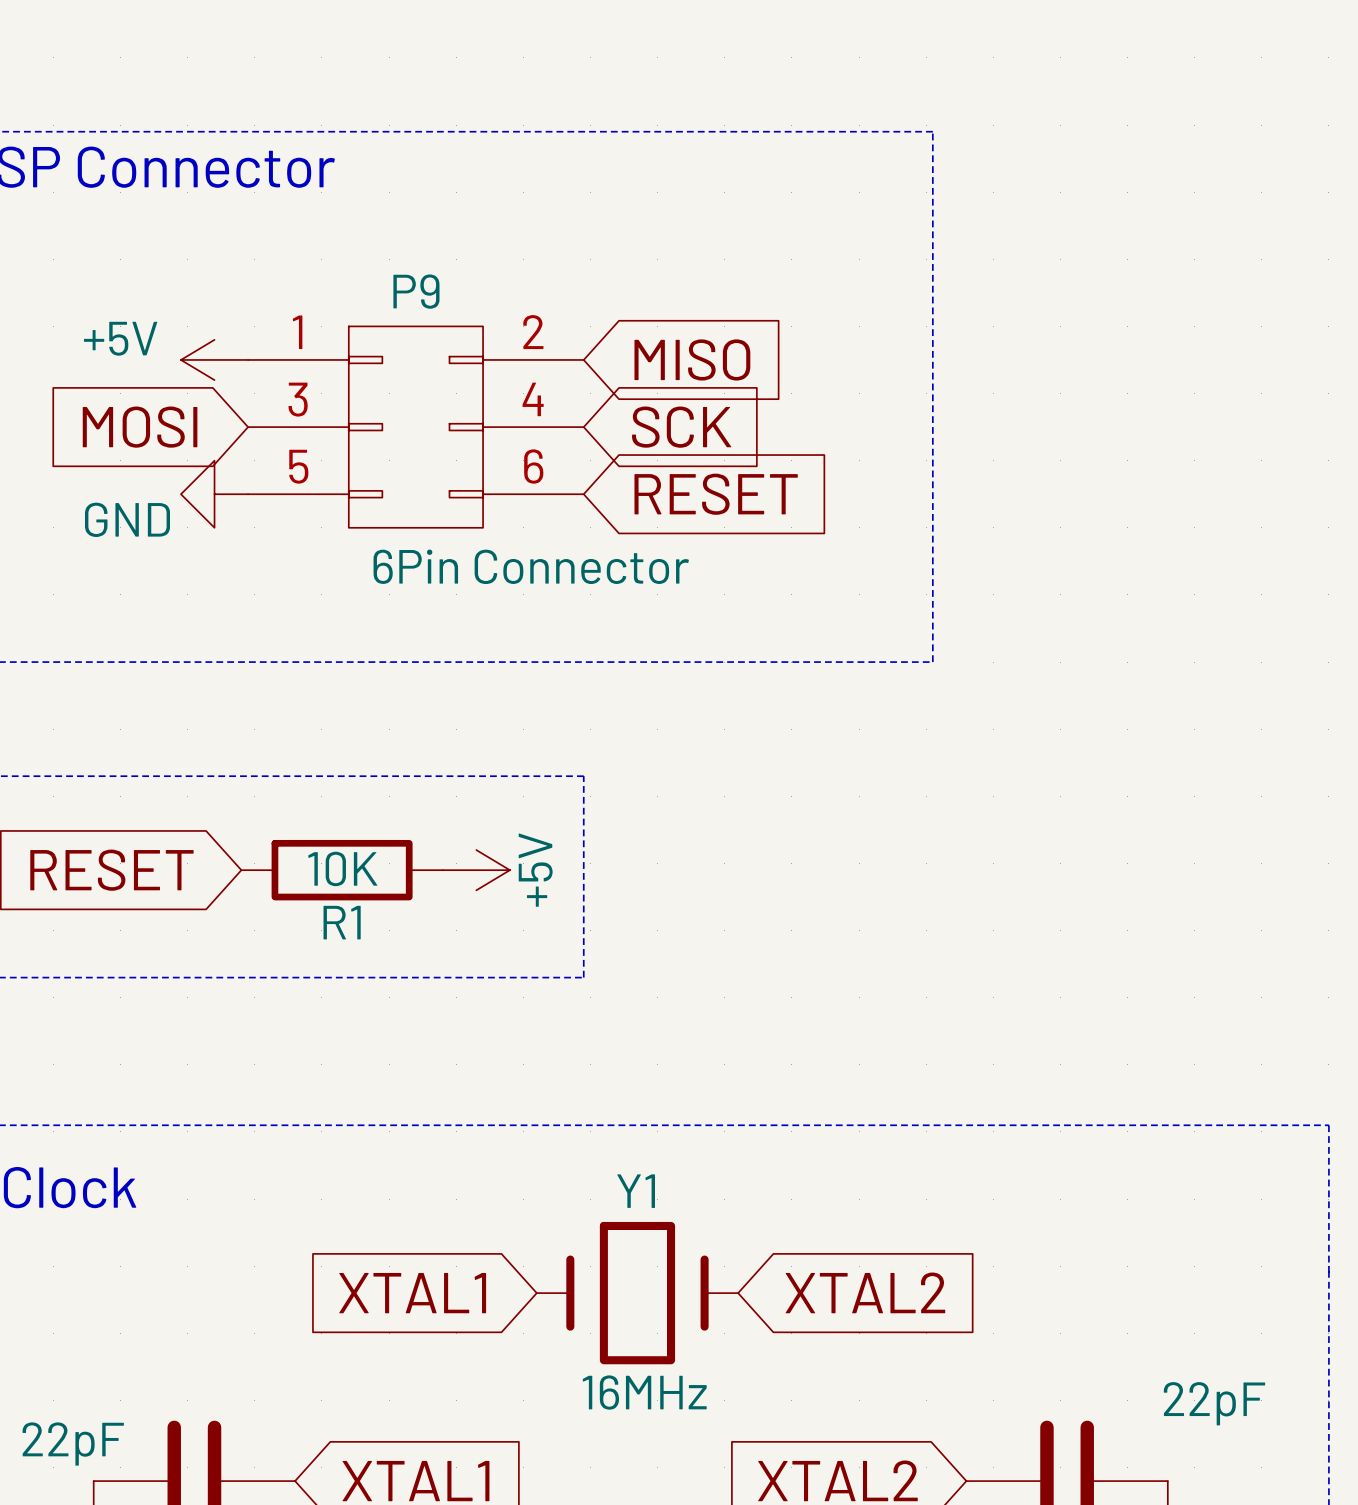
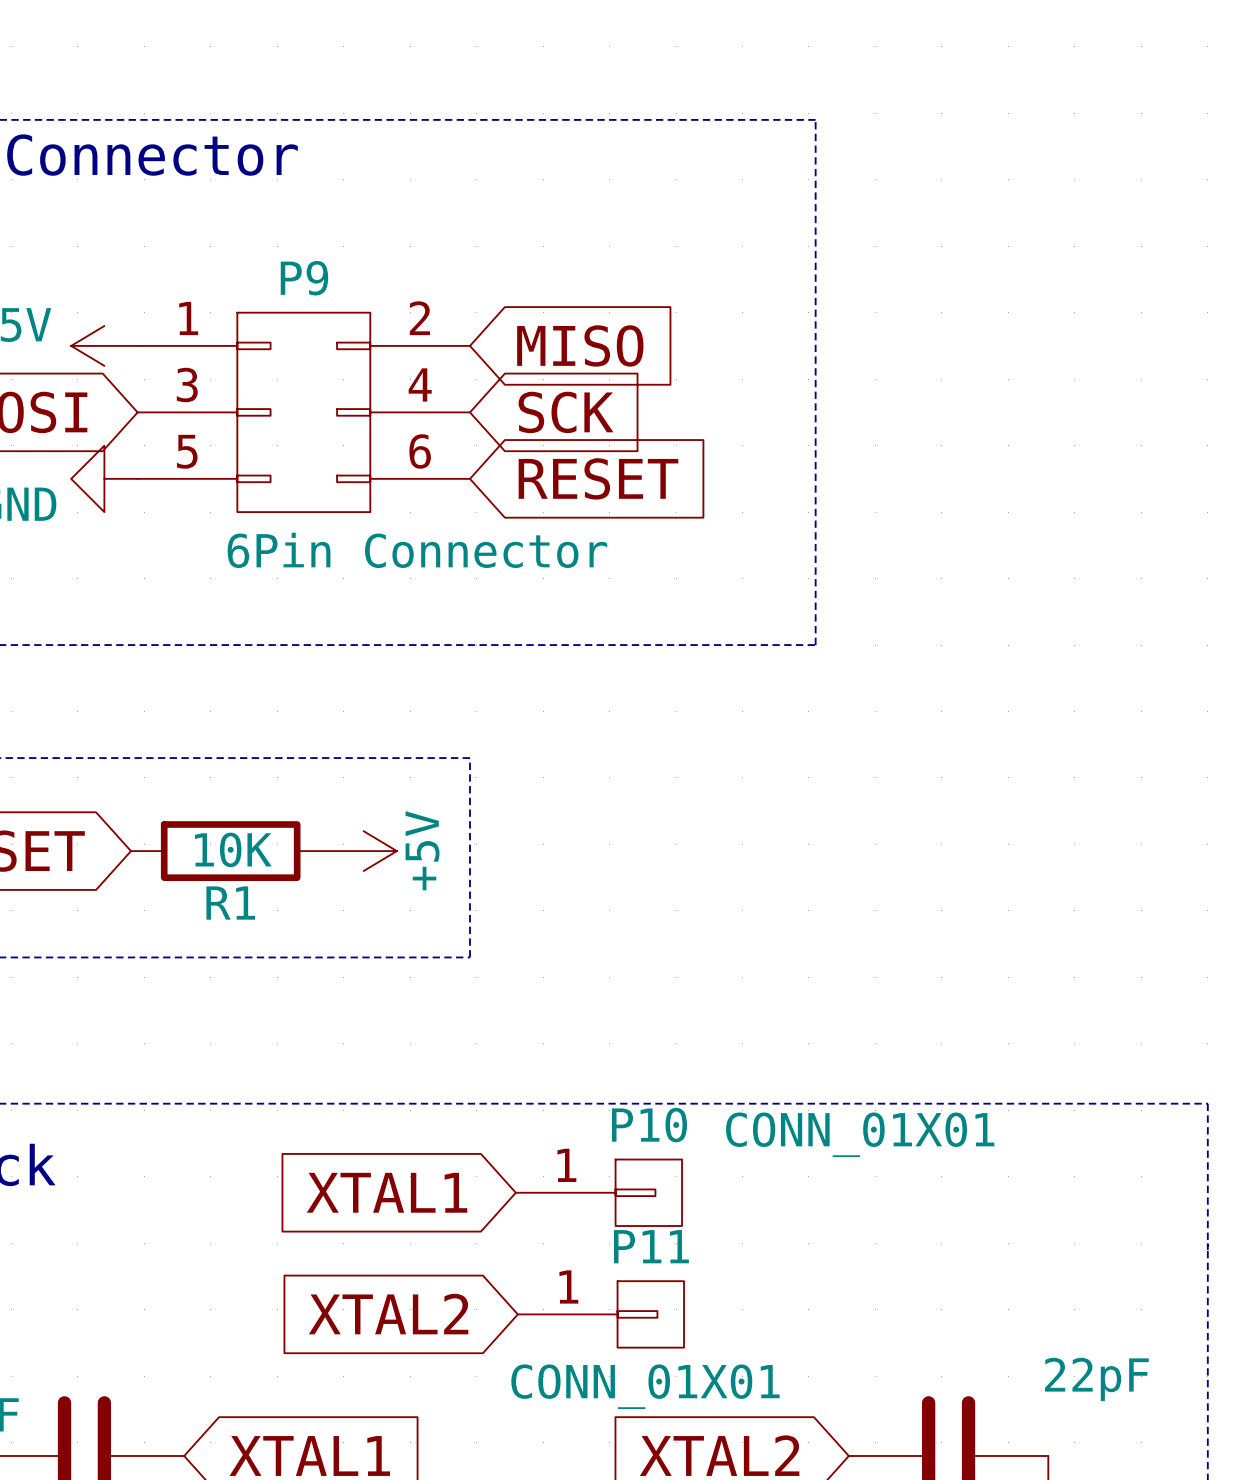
P10: none -> CONN_01X01 (598, 1192)
global label rotation: 0° (865, 1292) -> 180° (388, 1314)
global label position: XTAL2 (865, 1292) -> XTAL2 (388, 1314)
global label position: XTAL1 (412, 1293) -> XTAL1 (387, 1192)
Y1: 16MHz (637, 1293) -> none
P11: none -> CONN_01X01 (600, 1314)

